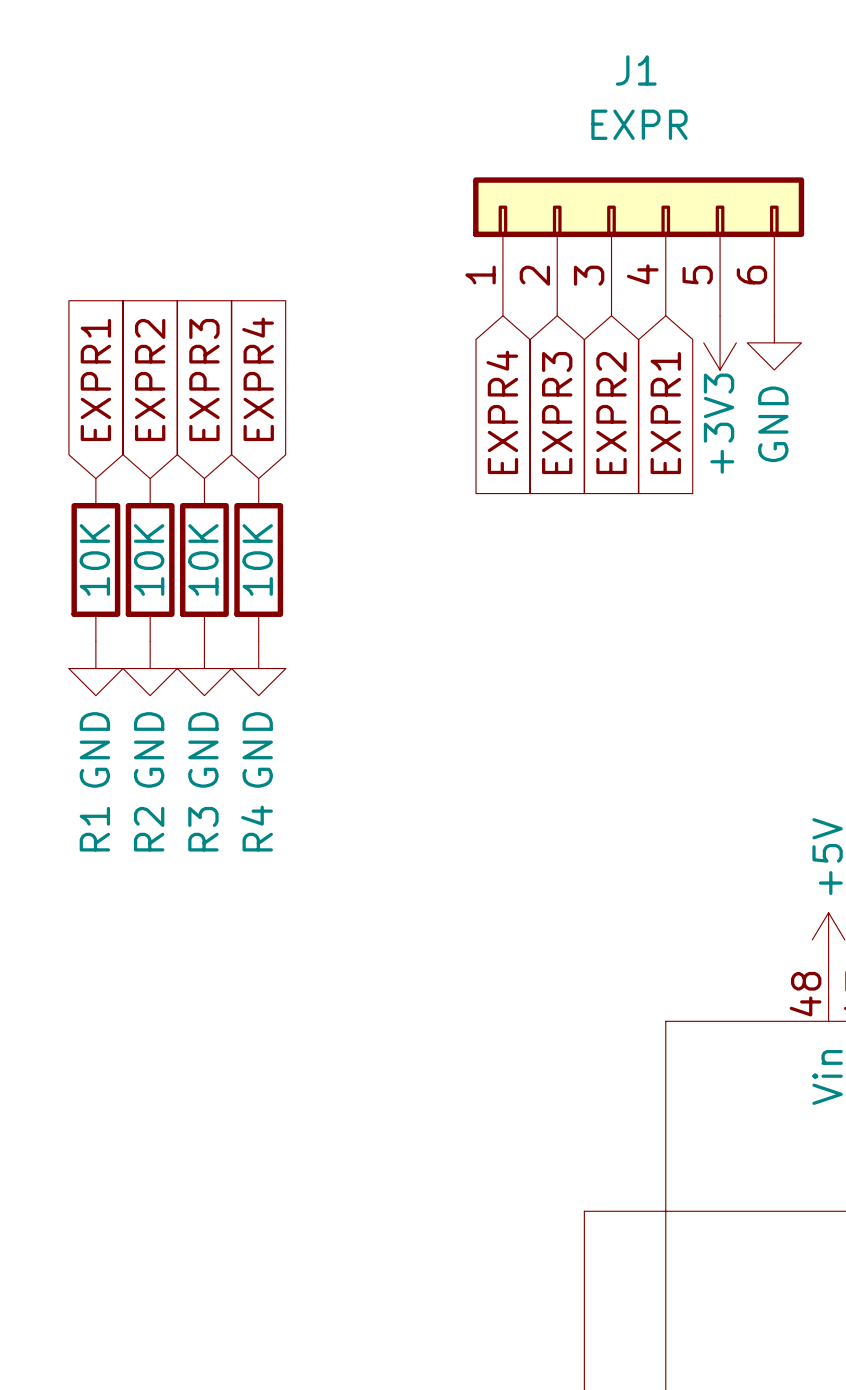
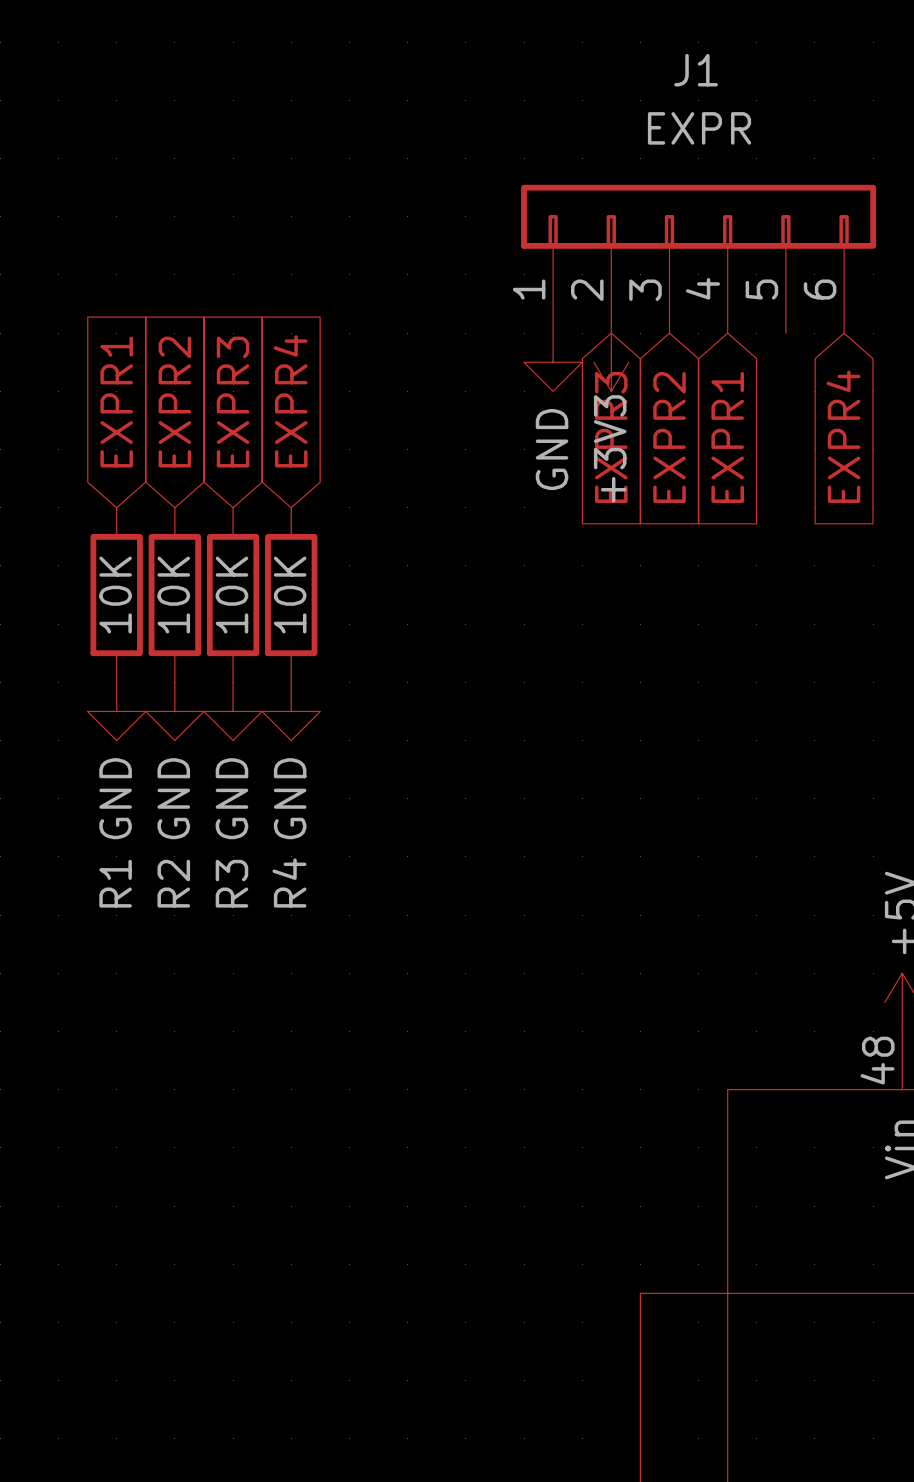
power symbol position: +3V3 (720, 342) -> +3V3 (611, 362)
power symbol position: GND (774, 342) -> GND (553, 362)
global label position: EXPR4 (502, 412) -> EXPR4 (843, 436)

